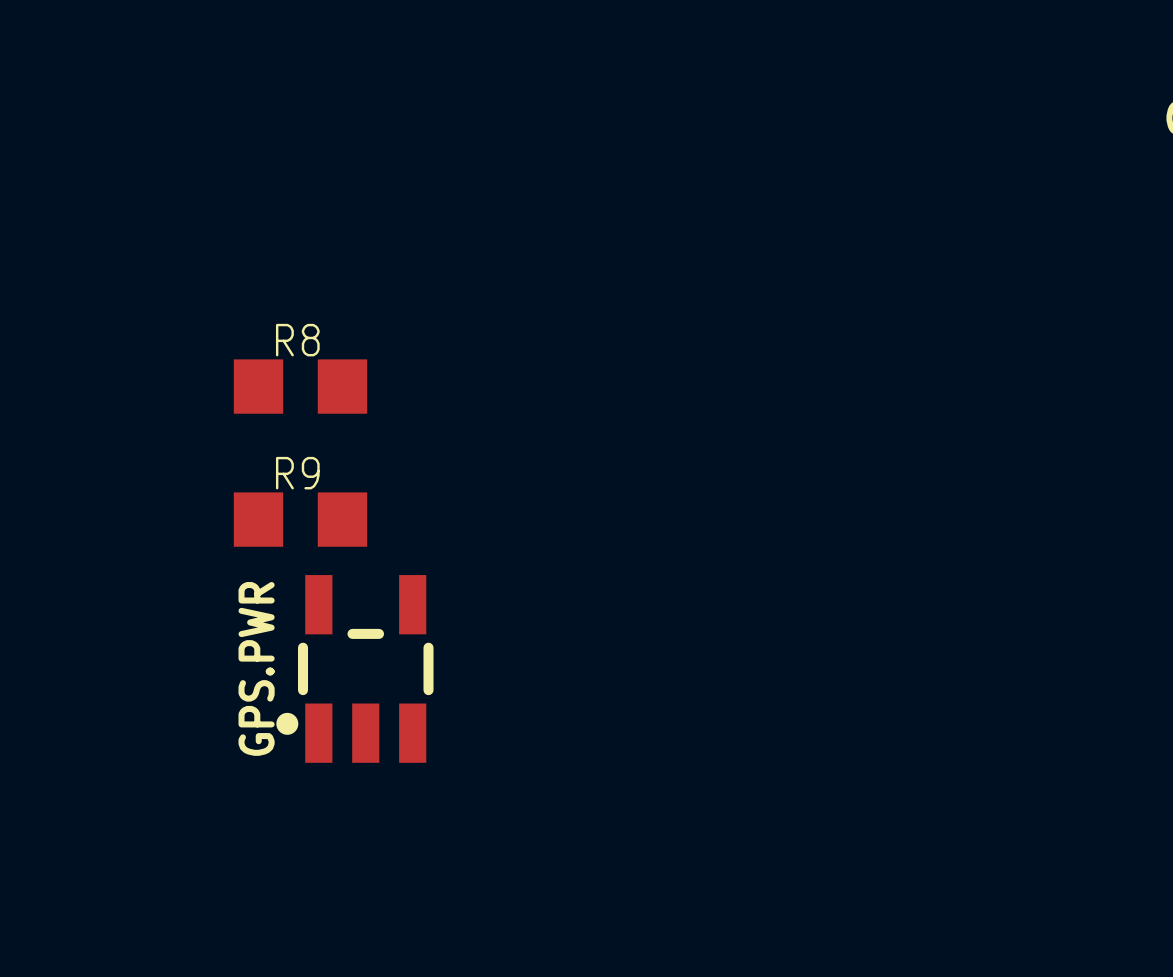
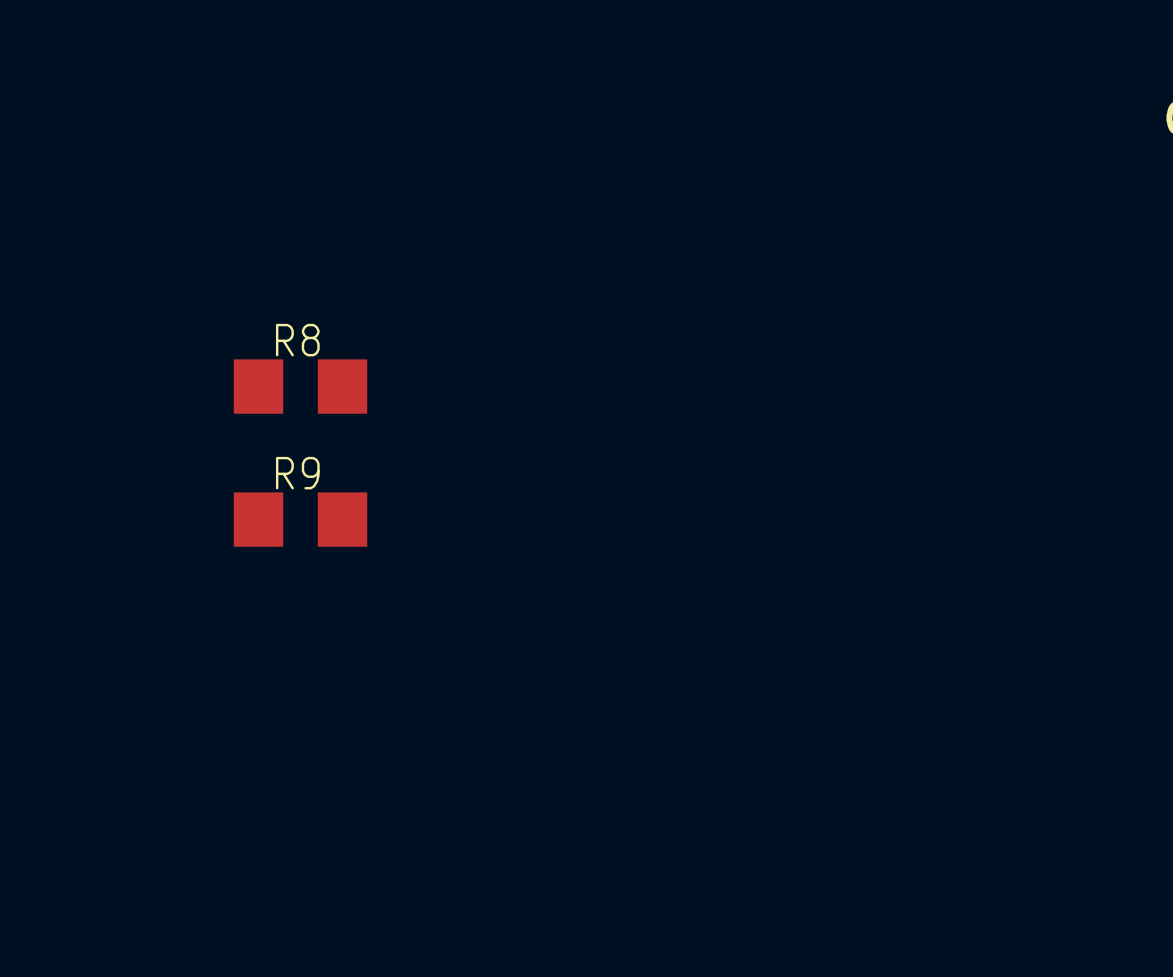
GPS.PWR: (354, 668) -> none

